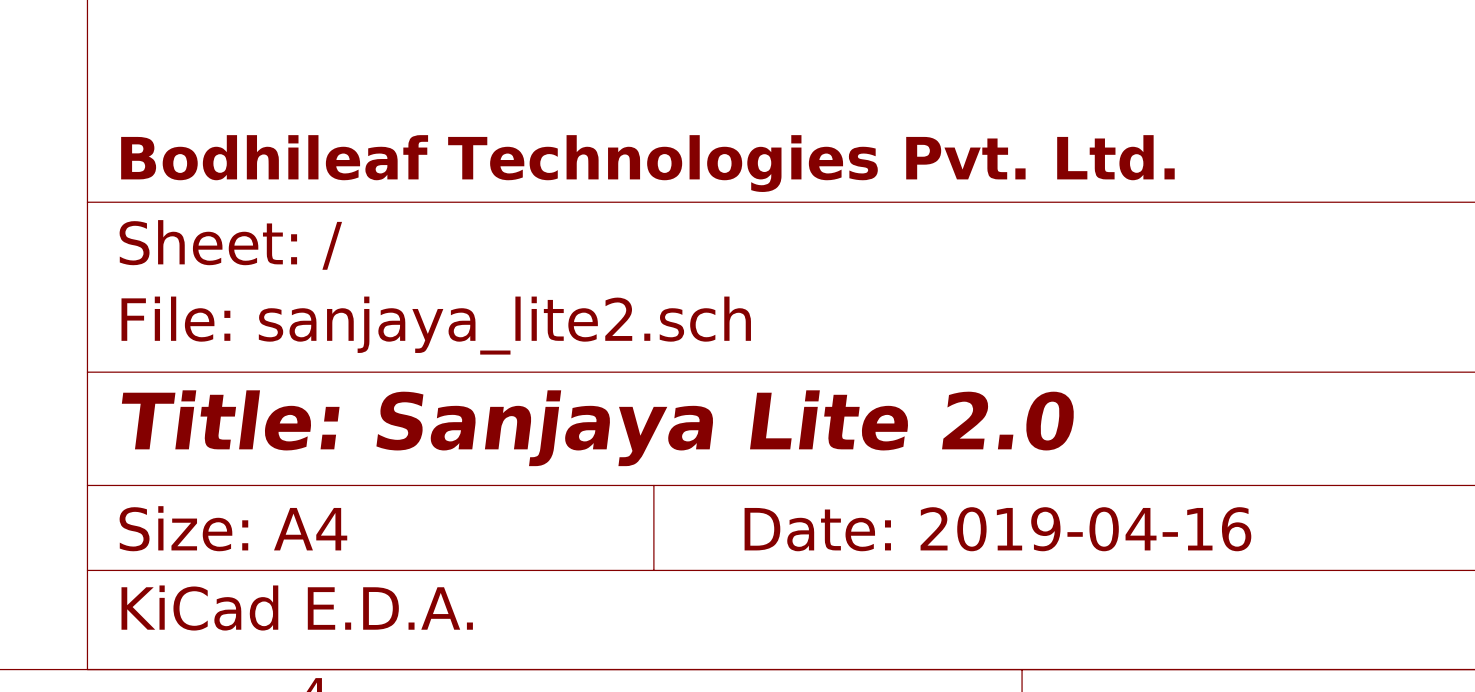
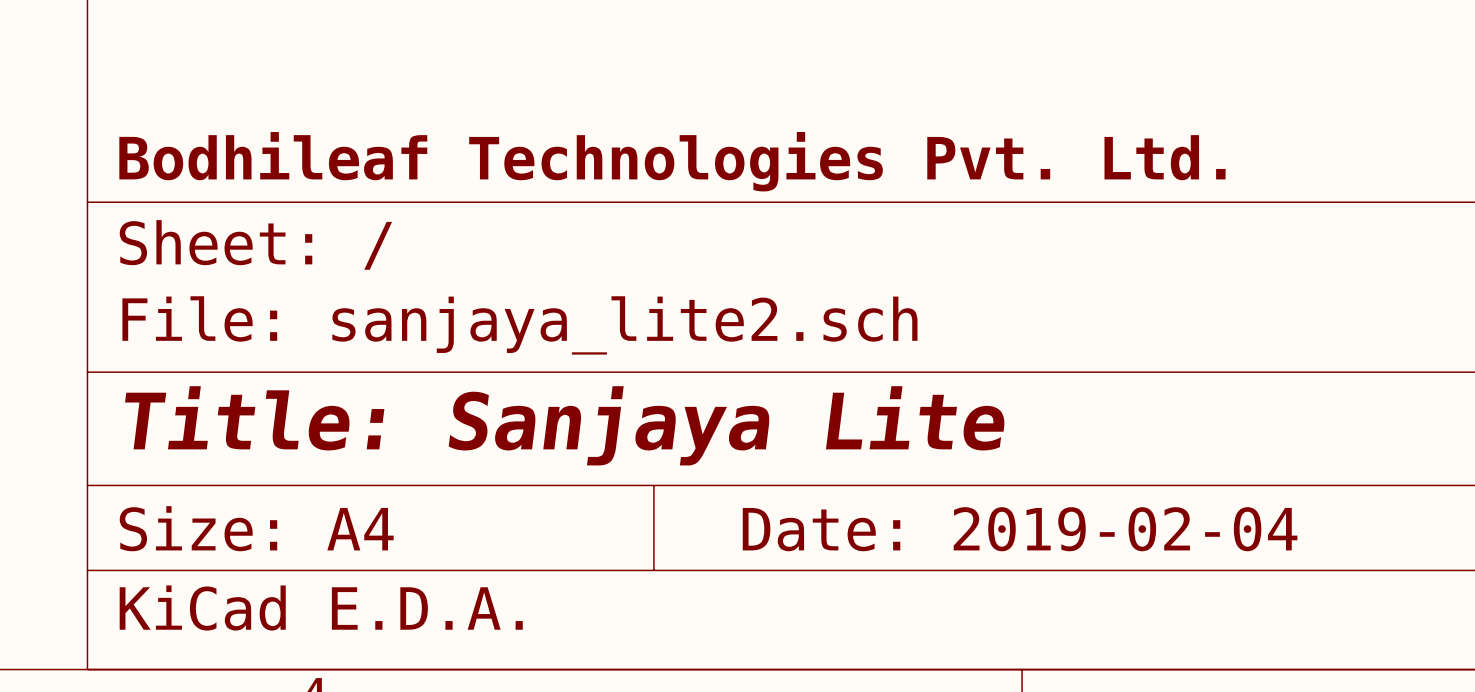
title block: Title: Sanjaya Lite 2.0 (598, 428) -> Title: Sanjaya Lite (565, 425)
title block: Date: 2019-04-16 (997, 529) -> Date: 2019-02-04 (1020, 529)

